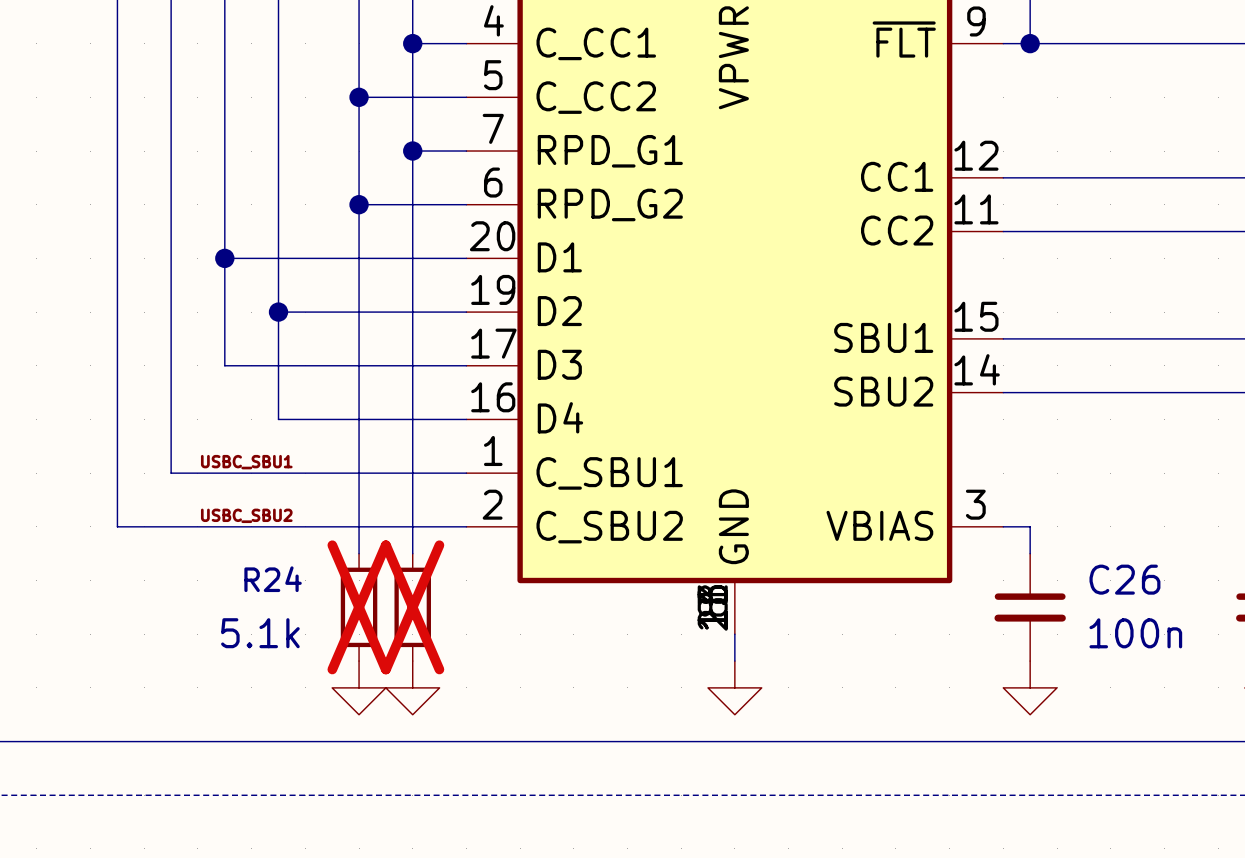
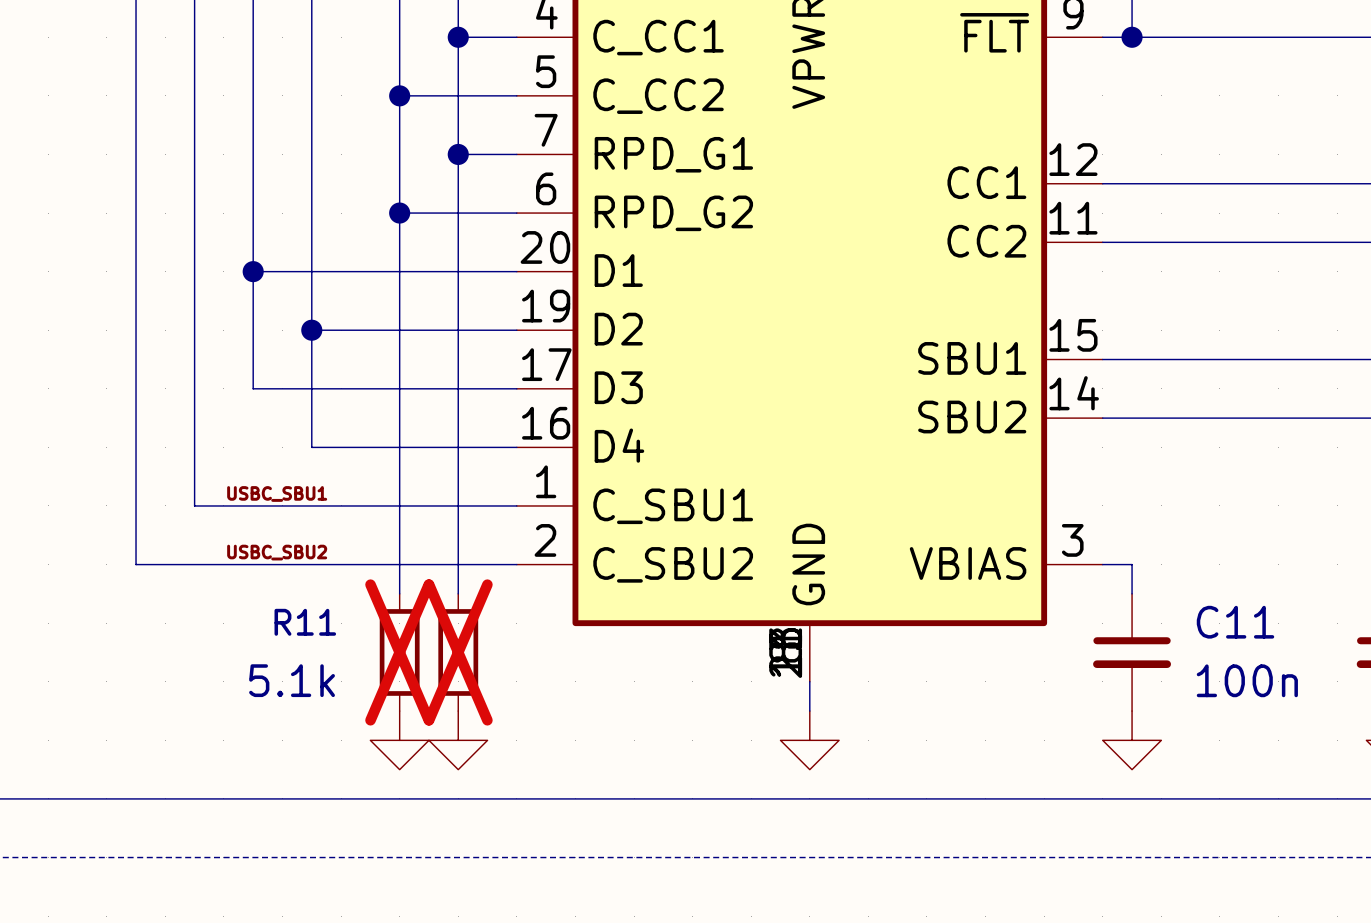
R24 name: R24 (273, 579) -> R11 (305, 622)
C26 name: C26 (1124, 579) -> C11 (1235, 622)

